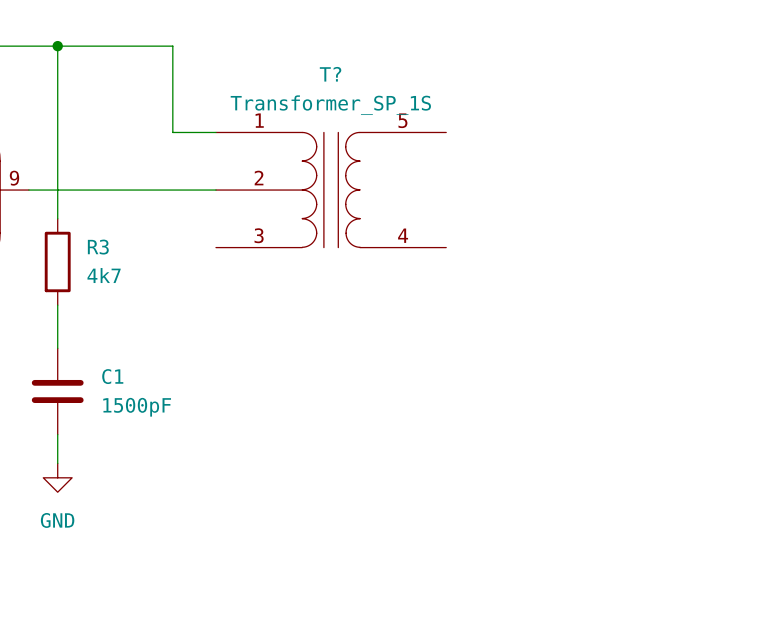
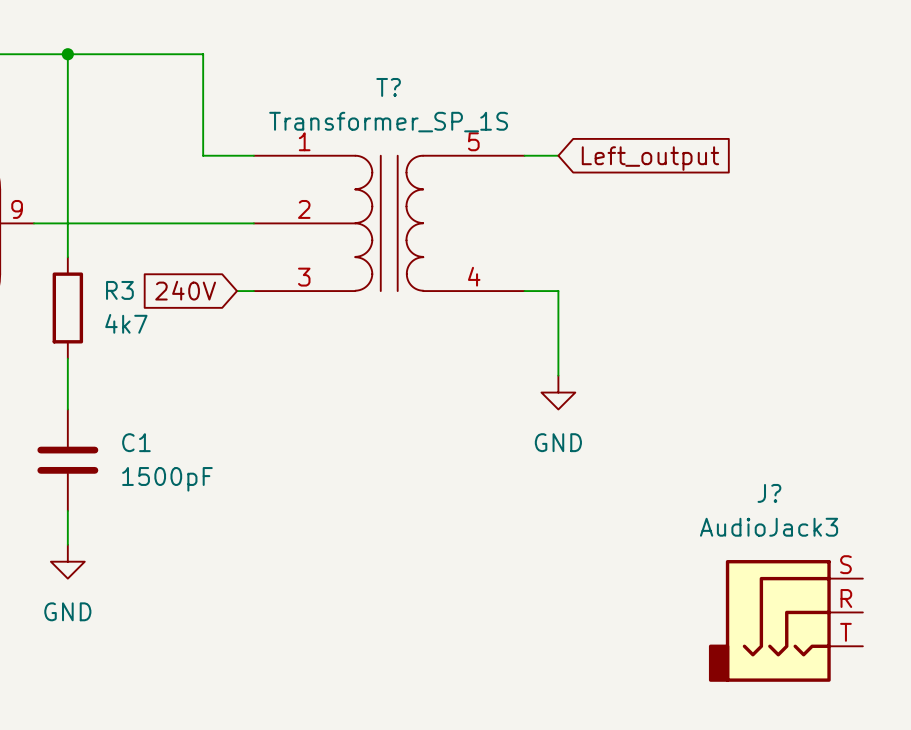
wire: none -> (524, 155) (558, 155)
global label: none -> Left_output (650, 158)
global label: none -> 240V (185, 290)
wire: none -> (237, 291) (253, 291)
wire: none -> (524, 291) (558, 291) (558, 375)
power symbol: none -> GND (558, 392)
J?: none -> AudioJack3 (785, 620)

